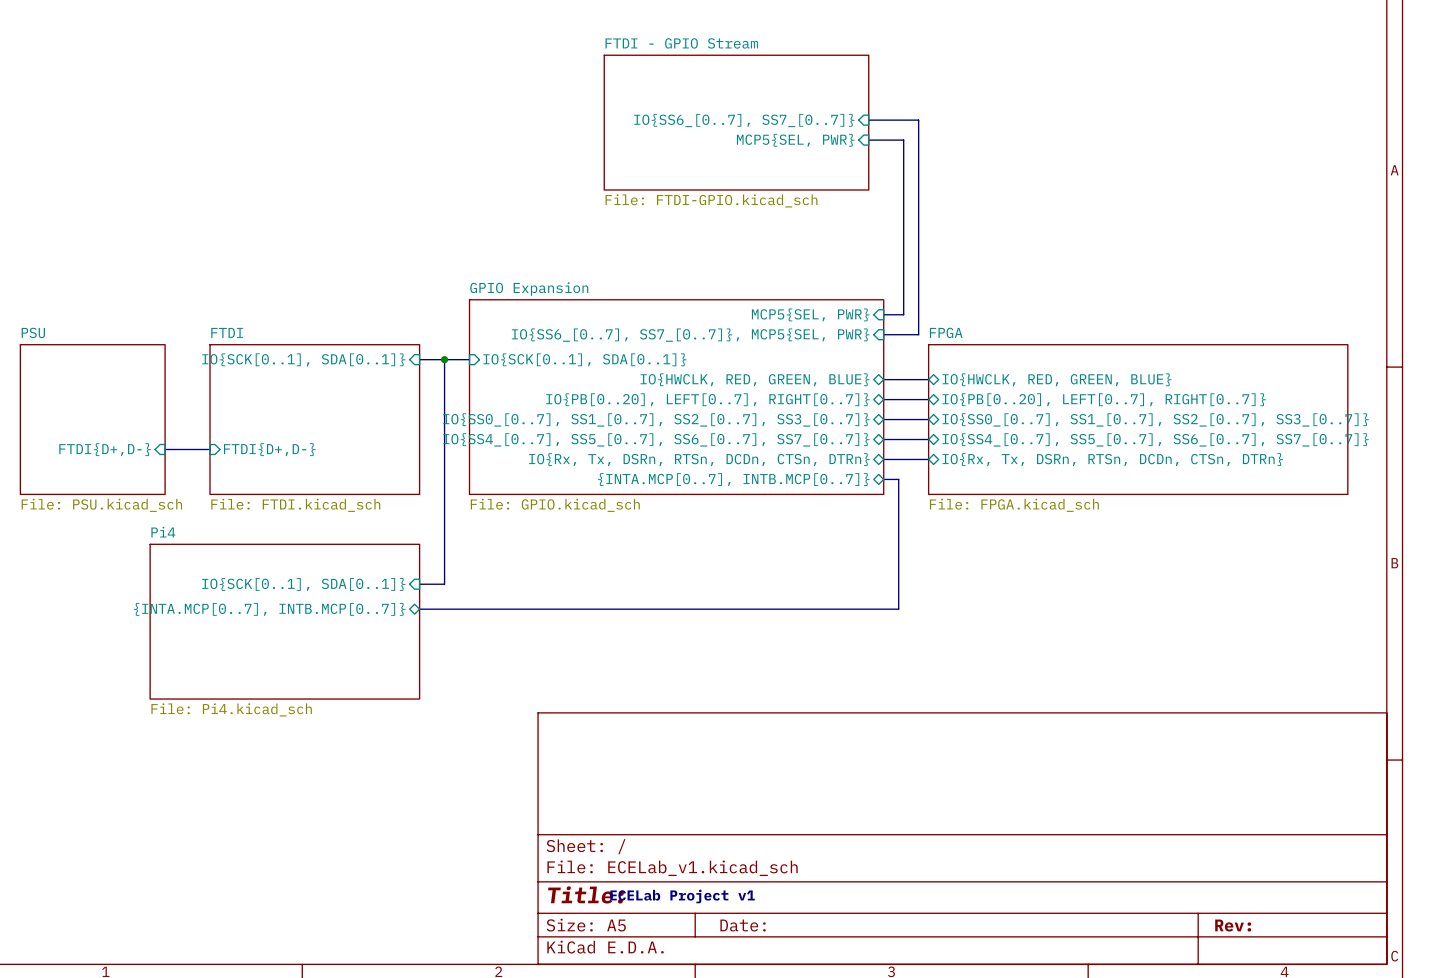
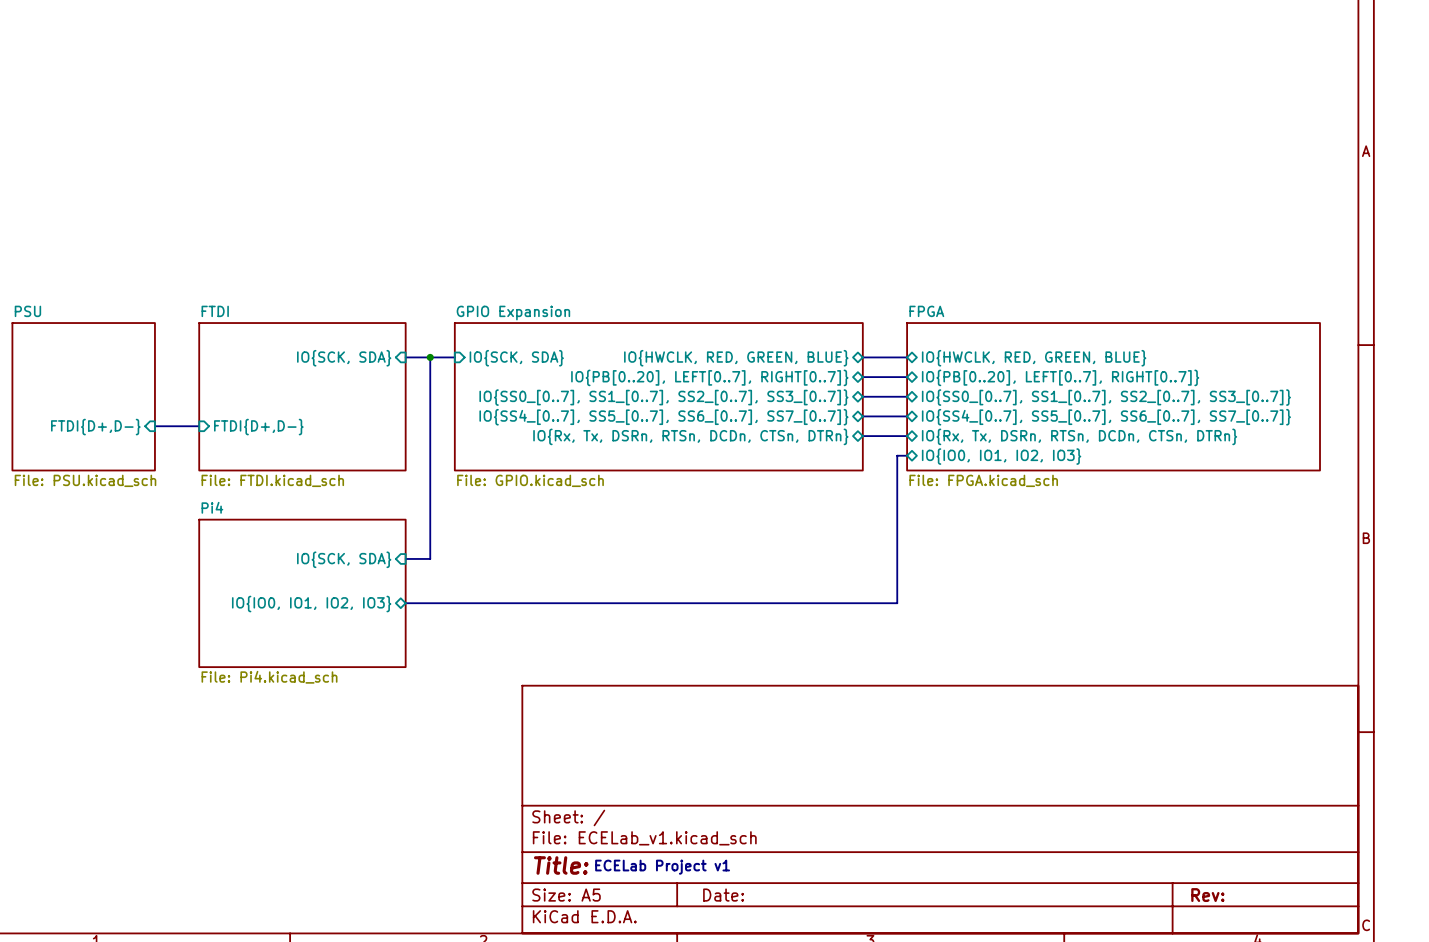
sheet pin: IO{SS6_[0..7], SS7_[0..7]} (744, 120) -> none
bus: (868, 120) (918, 120) (918, 334) (883, 334) -> none
sheet FTDI - GPIO Stream: File: FTDI-GPIO.kicad_sch (736, 122) -> none
sheet pin: MCP5{SEL, PWR} (795, 140) -> none
bus: (868, 140) (903, 140) (903, 314) (883, 314) -> none
sheet pin: MCP5{SEL, PWR} (810, 314) -> none
sheet pin: IO{SS6_[0..7], SS7_[0..7]}, MCP5{SEL, PWR} (690, 335) -> none
sheet pin: IO{SCK[0..1], SDA[0..1]} (303, 359) -> IO{SCK, SDA} (344, 358)
bus: (419, 359) (469, 359) -> (405, 357) (454, 357)
bus: (444, 359) (444, 379) -> none
junction position: (444, 359) -> (430, 357)
sheet pin: IO{SCK[0..1], SDA[0..1]} (584, 359) -> IO{SCK, SDA} (516, 358)
sheet GPIO Expansion: File: GPIO.kicad_sch (676, 397) -> none
sheet GPIO Expansion: none -> File: GPIO.kicad_sch (658, 396)
sheet pin: {INTA.MCP[0..7], INTB.MCP[0..7]} (733, 479) -> none
bus: (883, 479) (898, 479) (898, 609) (419, 609) -> none
bus: none -> (907, 455) (897, 455) (897, 603) (405, 603)
sheet pin: none -> IO{IO0, IO1, IO2, IO3} (1001, 456)
sheet Pi4 name position: Pi4 (163, 532) -> Pi4 (212, 507)
sheet Pi4 shape: [149, 543, 421, 700] -> [198, 519, 407, 668]
sheet pin: IO{SCK[0..1], SDA[0..1]} (303, 584) -> IO{SCK, SDA} (344, 559)
sheet pin: {INTA.MCP[0..7], INTB.MCP[0..7]} (269, 609) -> none
sheet pin: none -> IO{IO0, IO1, IO2, IO3} (311, 604)
sheet Pi4 value position: File: Pi4.kicad_sch (231, 709) -> File: Pi4.kicad_sch (269, 677)

